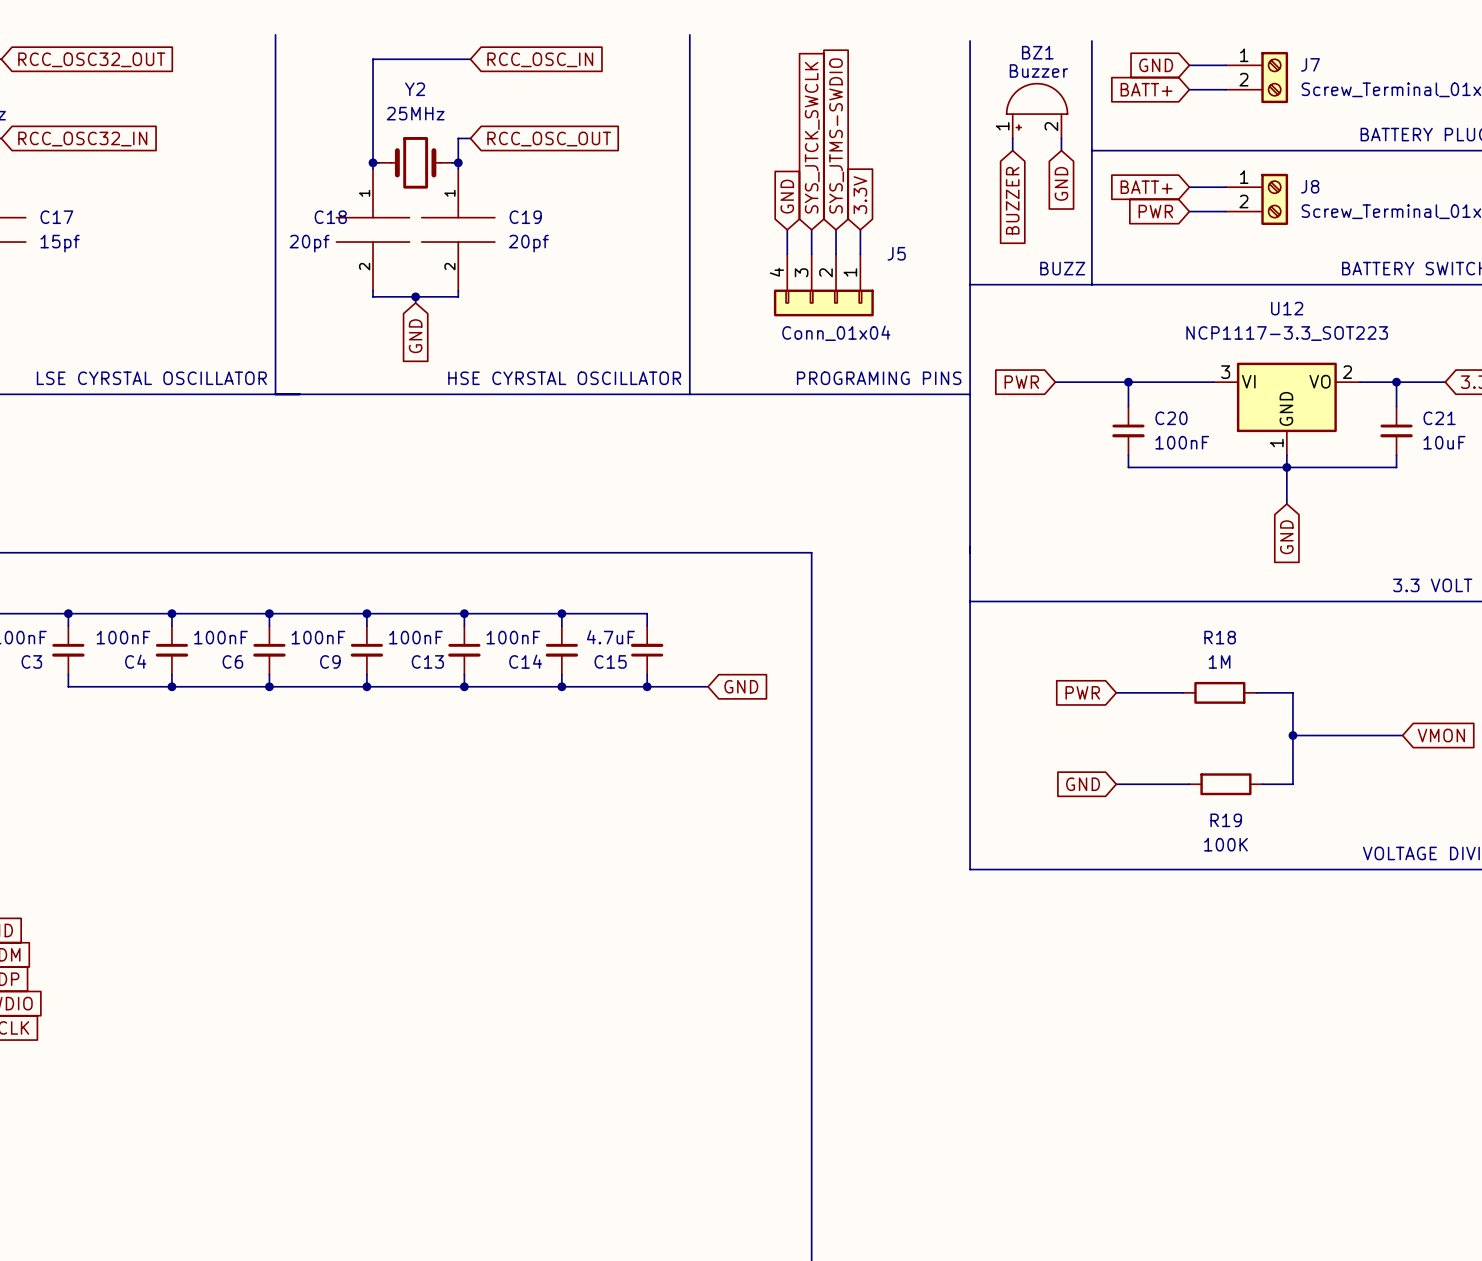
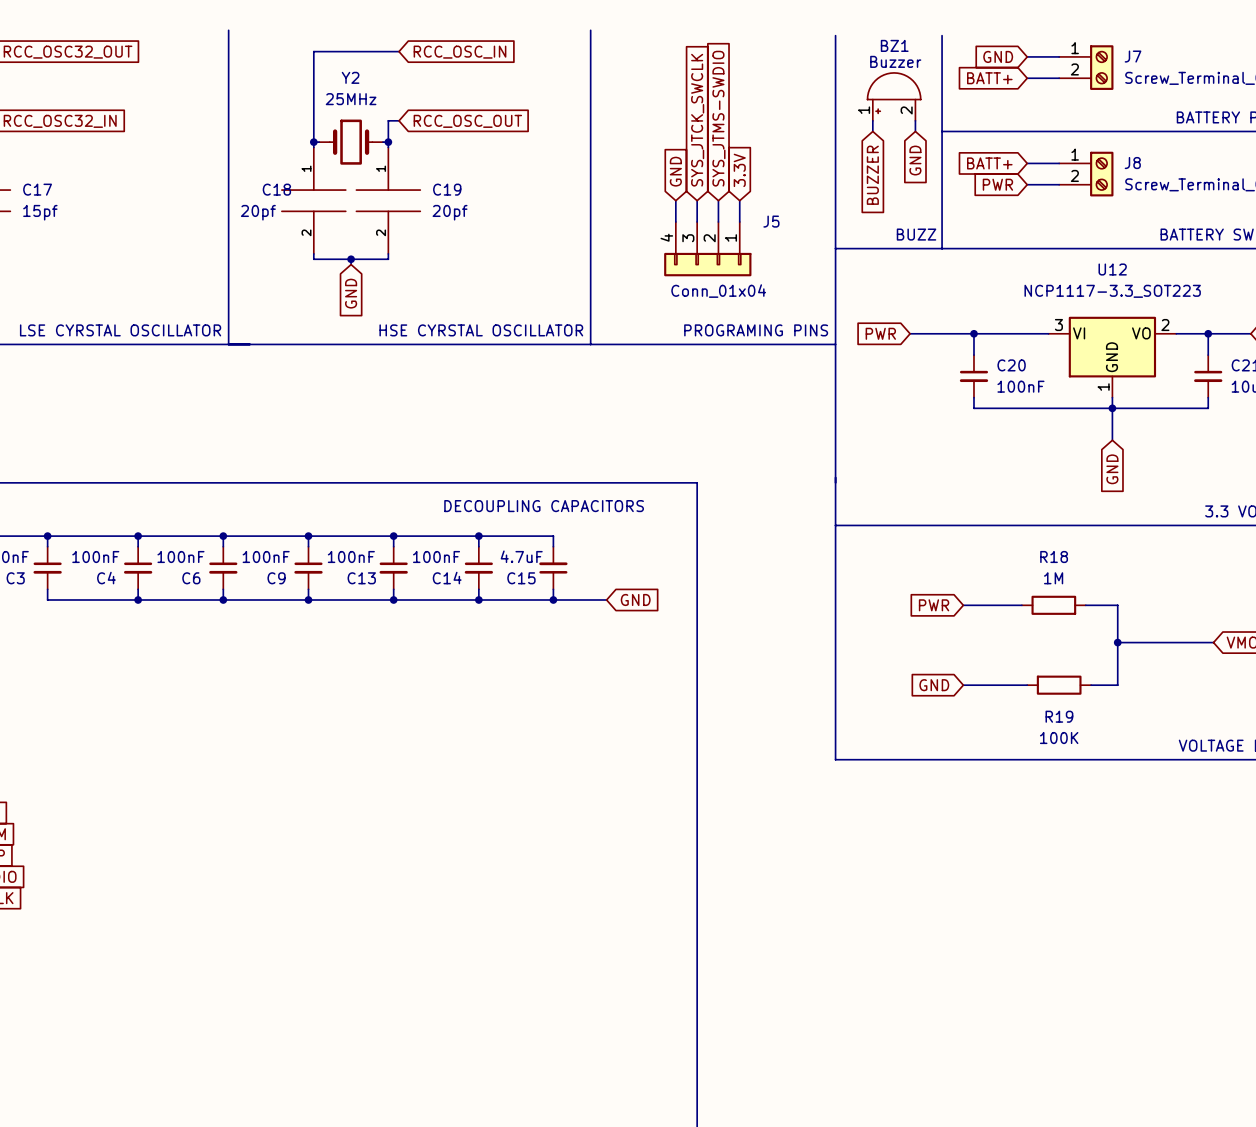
text: none -> DECOUPLING CAPACITORS (544, 506)

